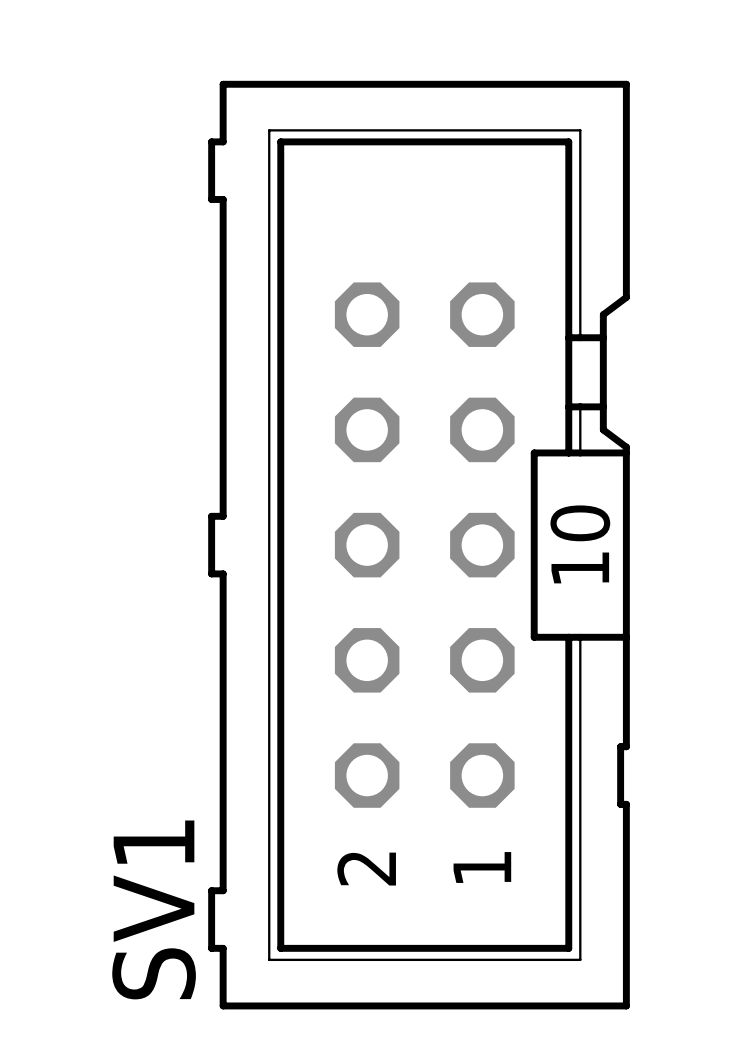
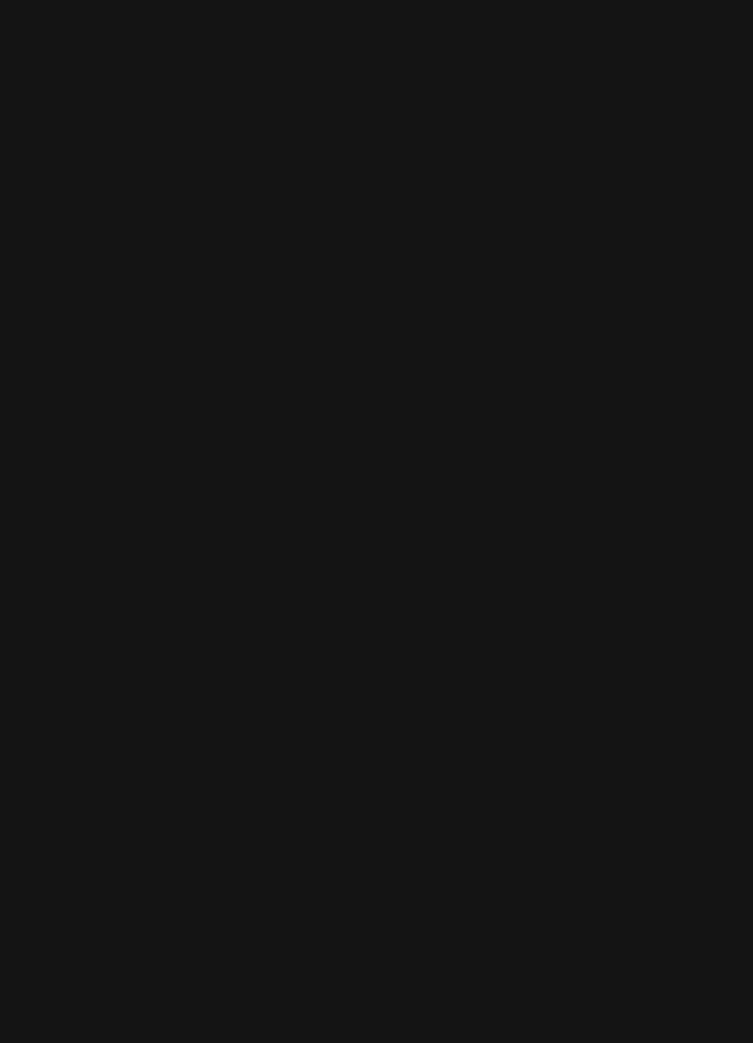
SV1: (419, 545) -> none

